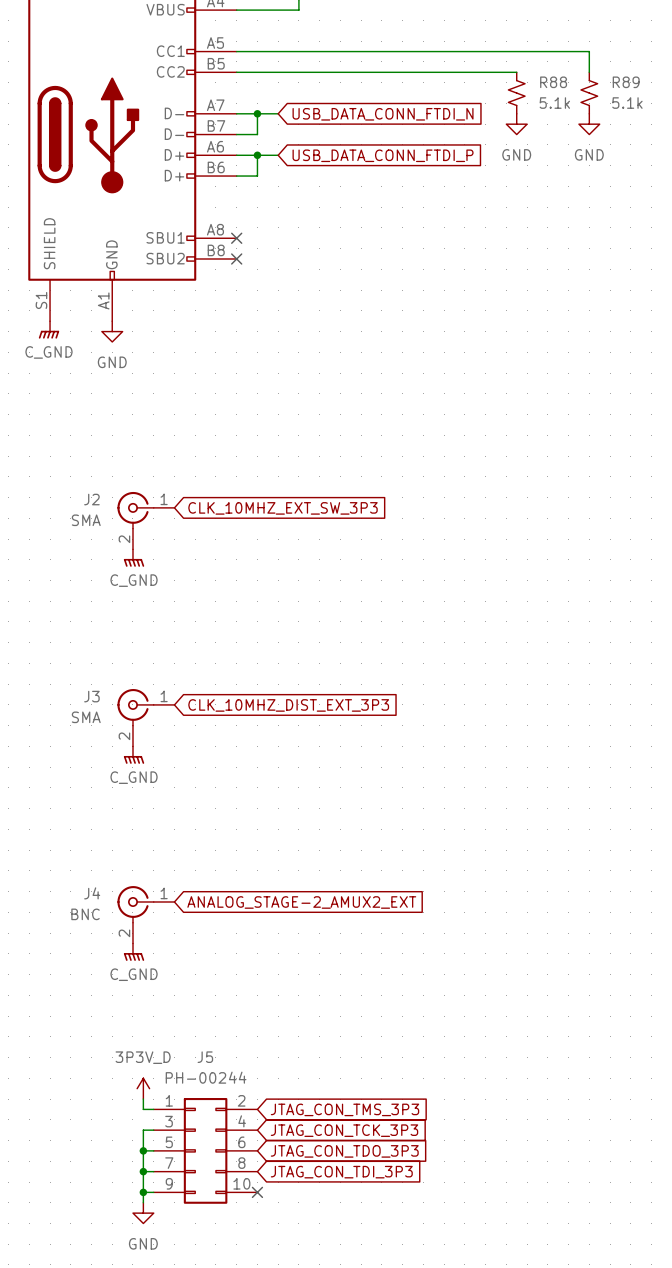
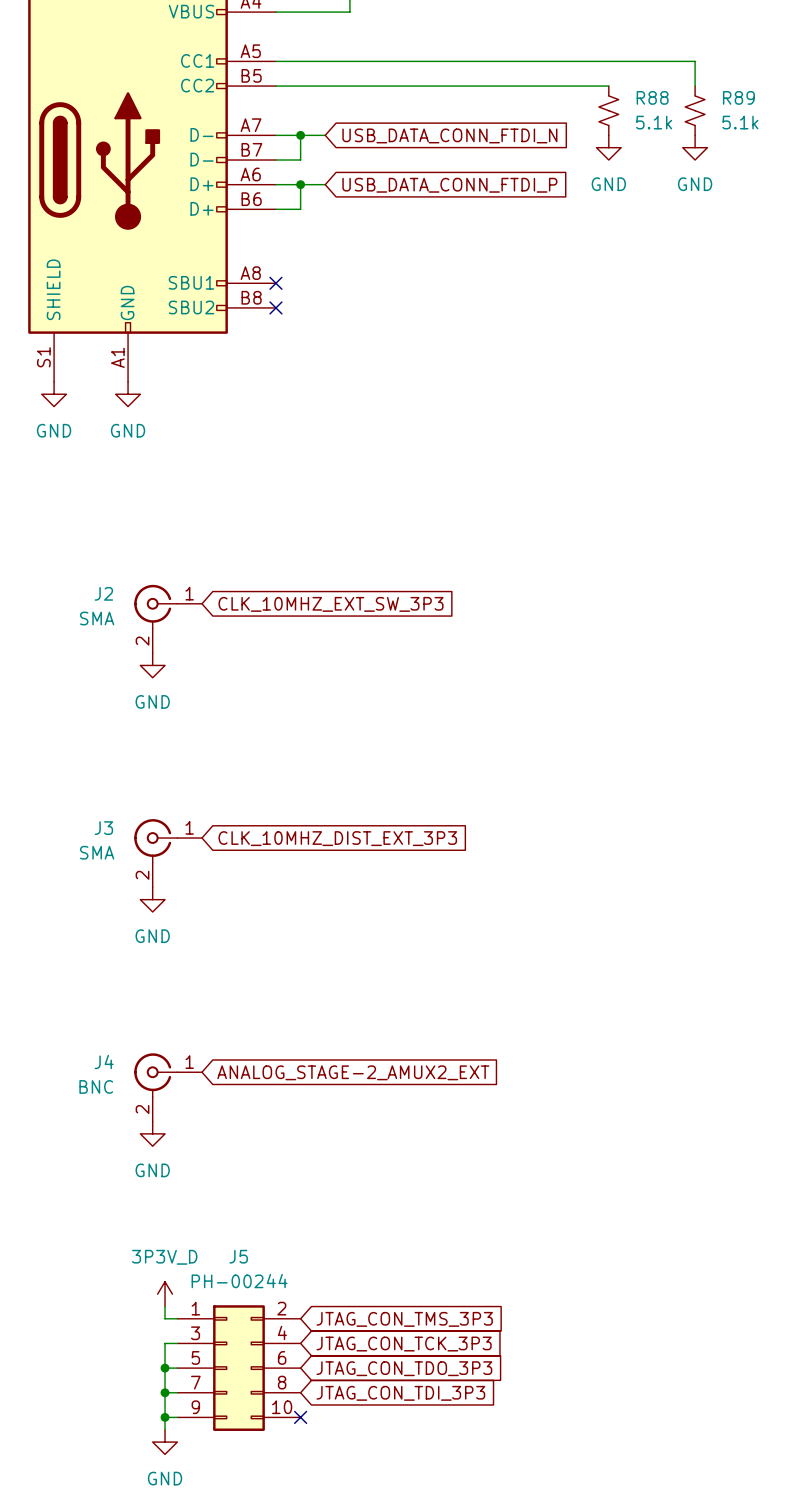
power symbol: C_GND (48, 329) -> GND (54, 394)
power symbol: C_GND (134, 558) -> GND (152, 665)
power symbol: C_GND (134, 755) -> GND (152, 899)
power symbol: C_GND (134, 952) -> GND (152, 1133)

